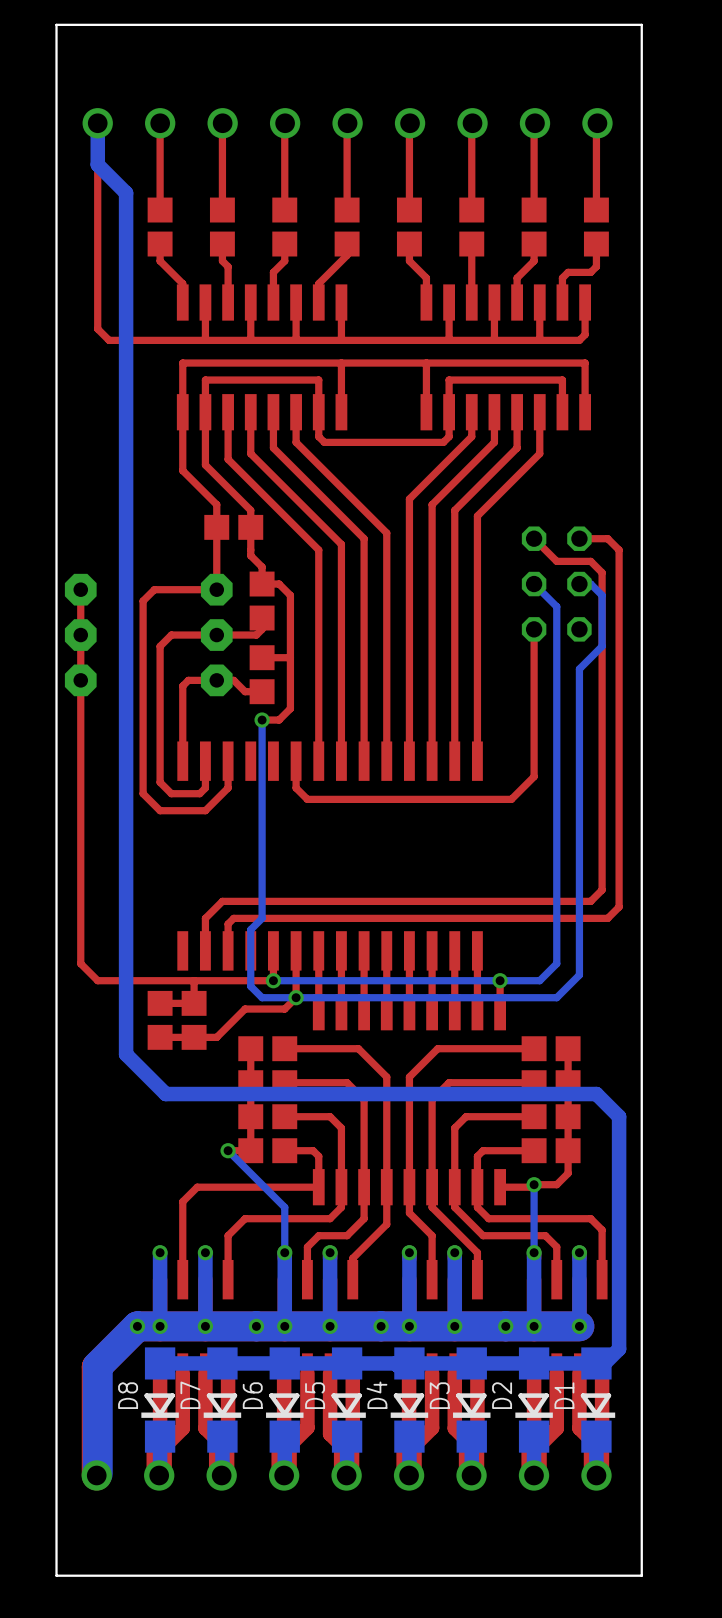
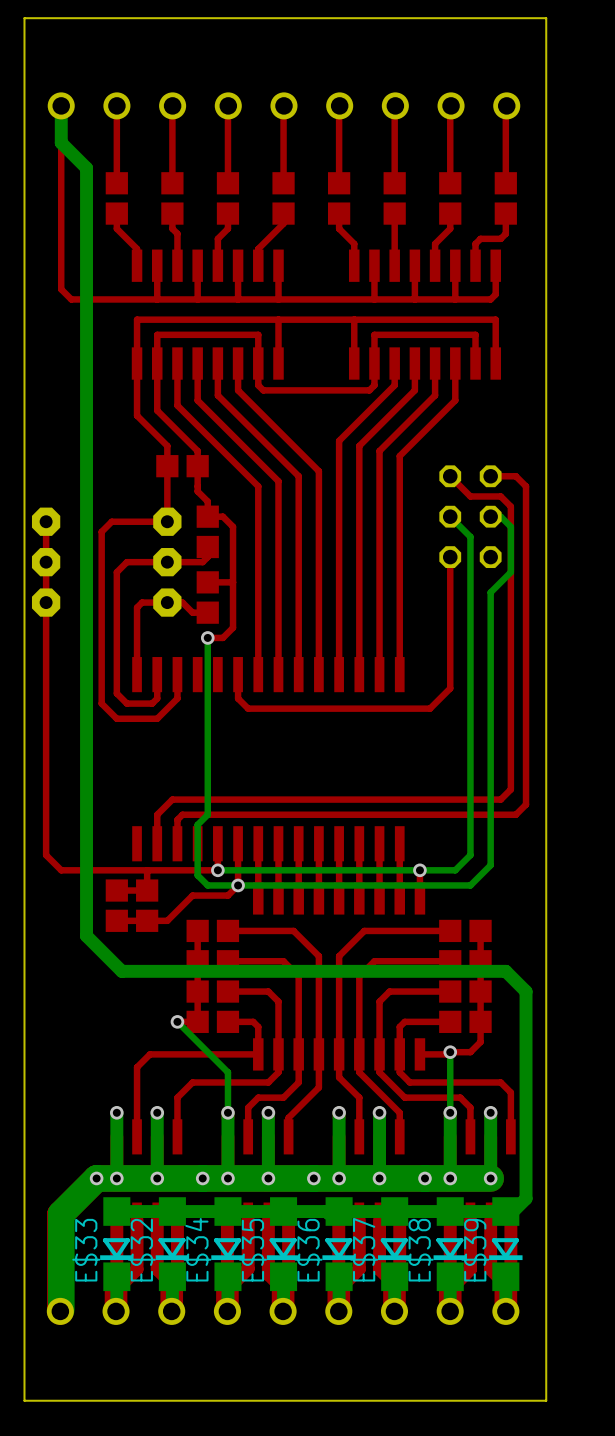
D8 name: D8 (128, 1395) -> E$33 (86, 1250)
D7 name: D7 (190, 1395) -> E$32 (141, 1250)
D6 name: D6 (252, 1395) -> E$34 (197, 1249)
D5 name: D5 (315, 1395) -> E$35 (252, 1250)
D4 name: D4 (376, 1395) -> E$36 (308, 1250)
D3 name: D3 (439, 1395) -> E$37 (364, 1249)
D2 name: D2 (502, 1395) -> E$38 (419, 1250)
D1 name: D1 (564, 1395) -> E$39 (475, 1250)

